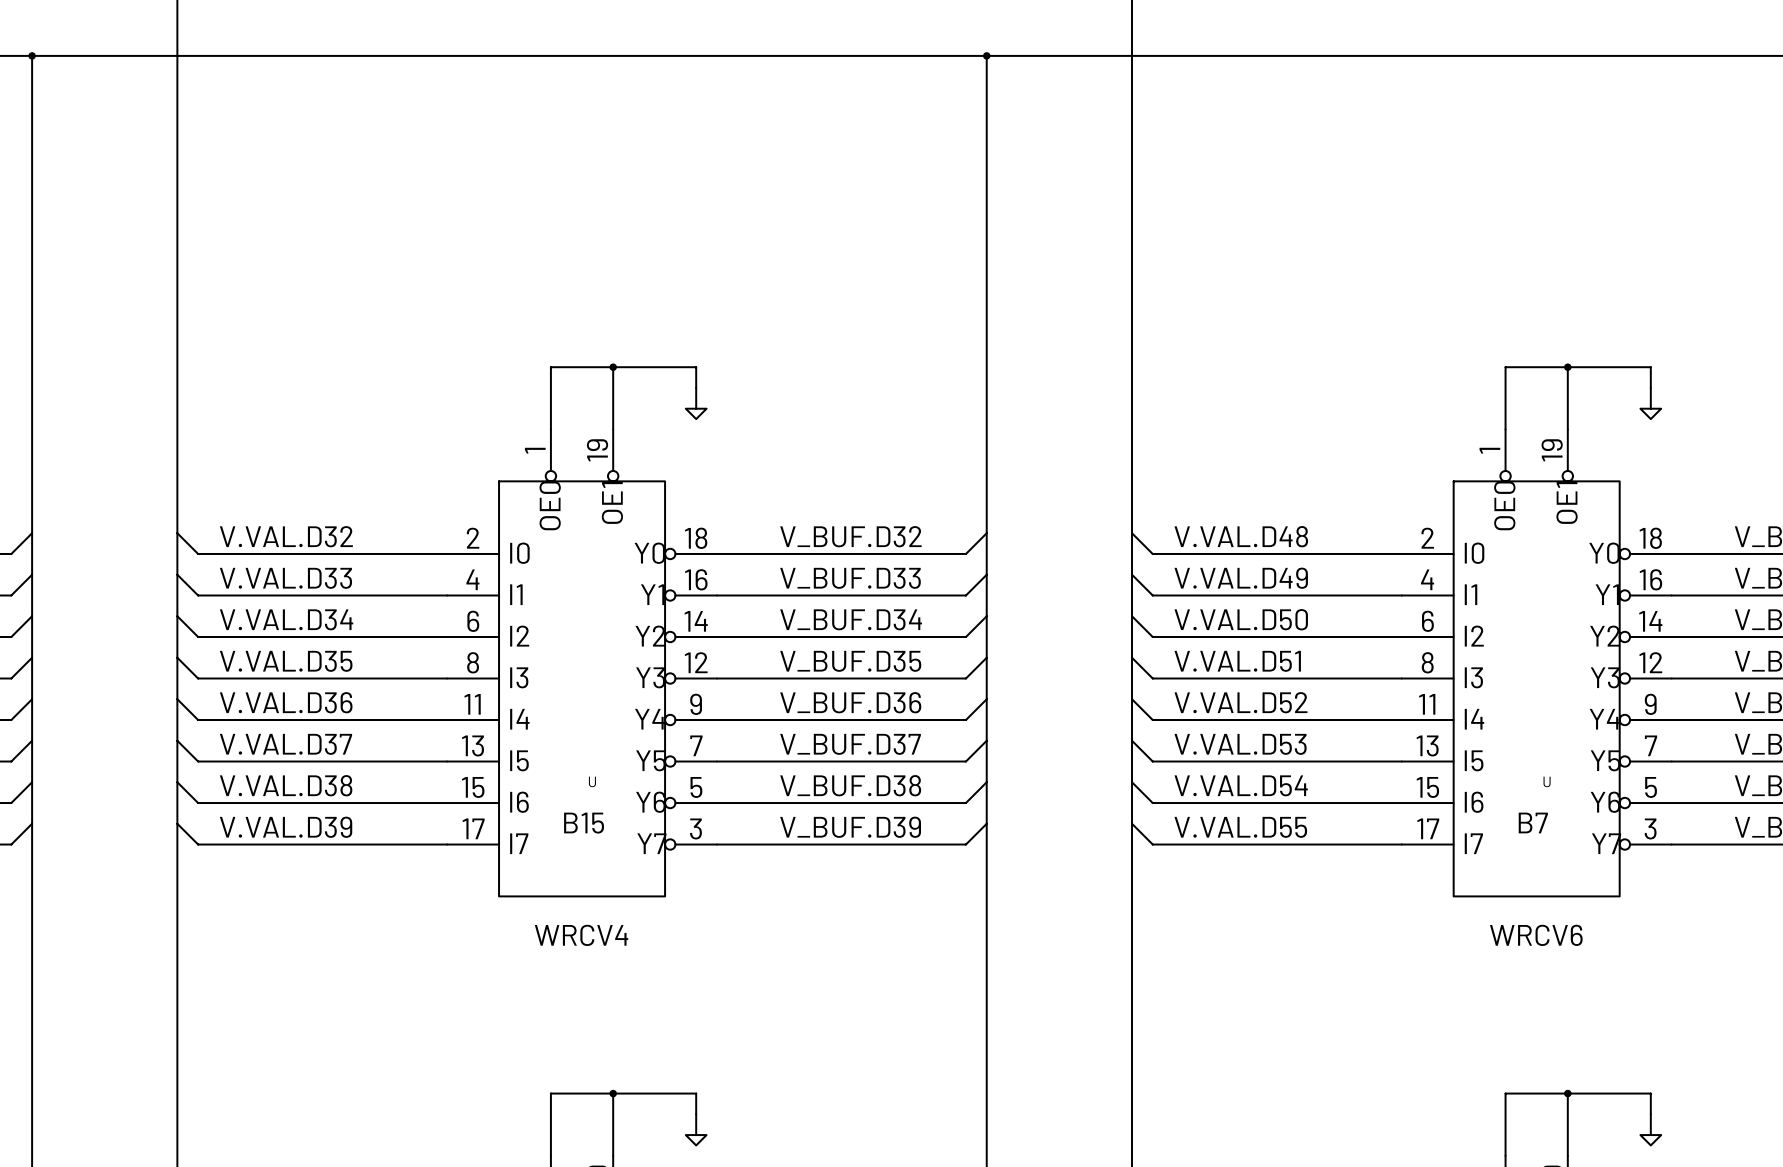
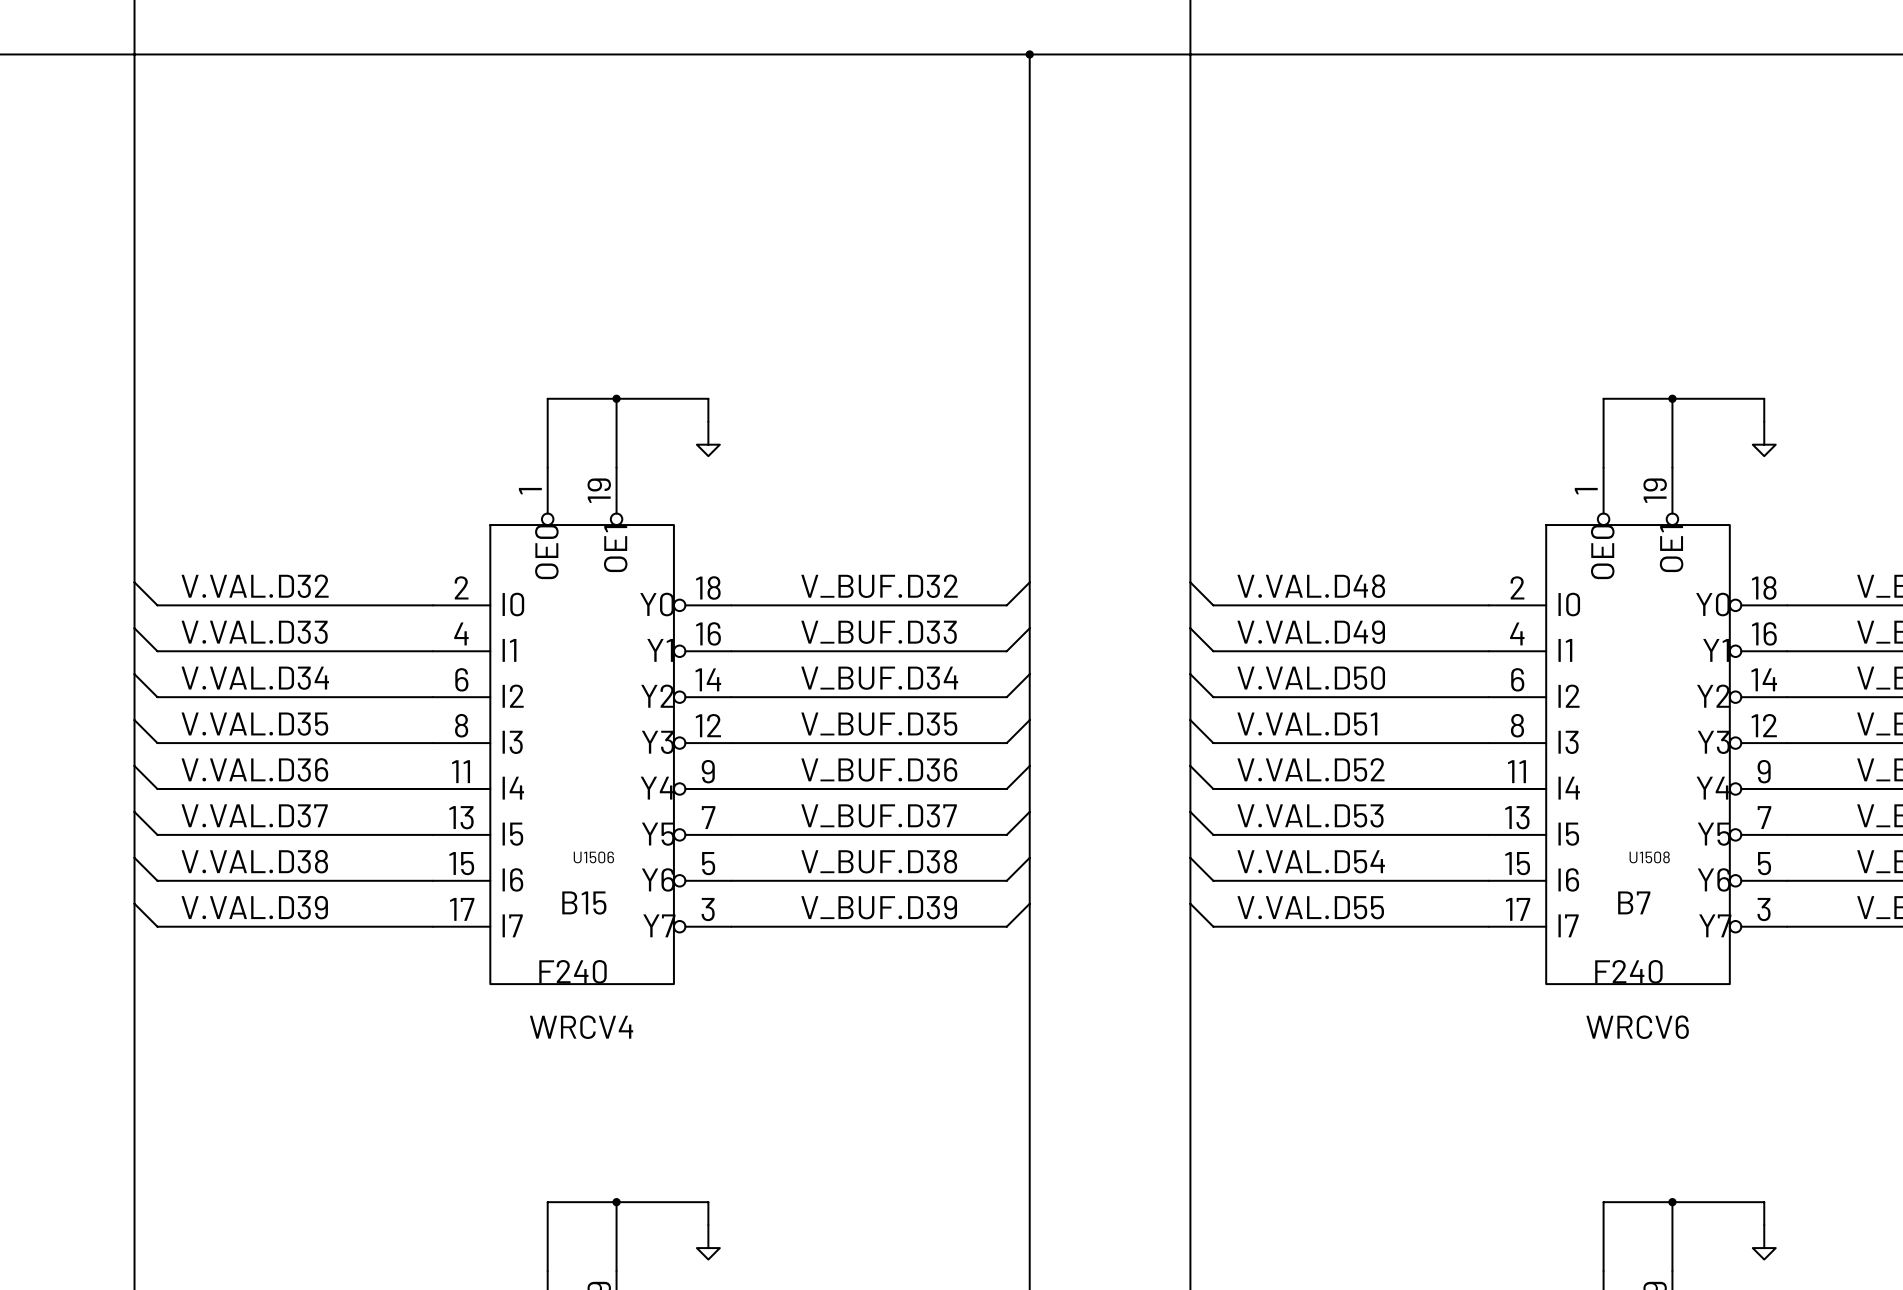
U name: U (592, 781) -> U1506 (593, 857)
U name: U (1547, 781) -> U1508 (1649, 857)
U value: none -> F240 (572, 971)
U value: none -> F240 (1628, 971)

